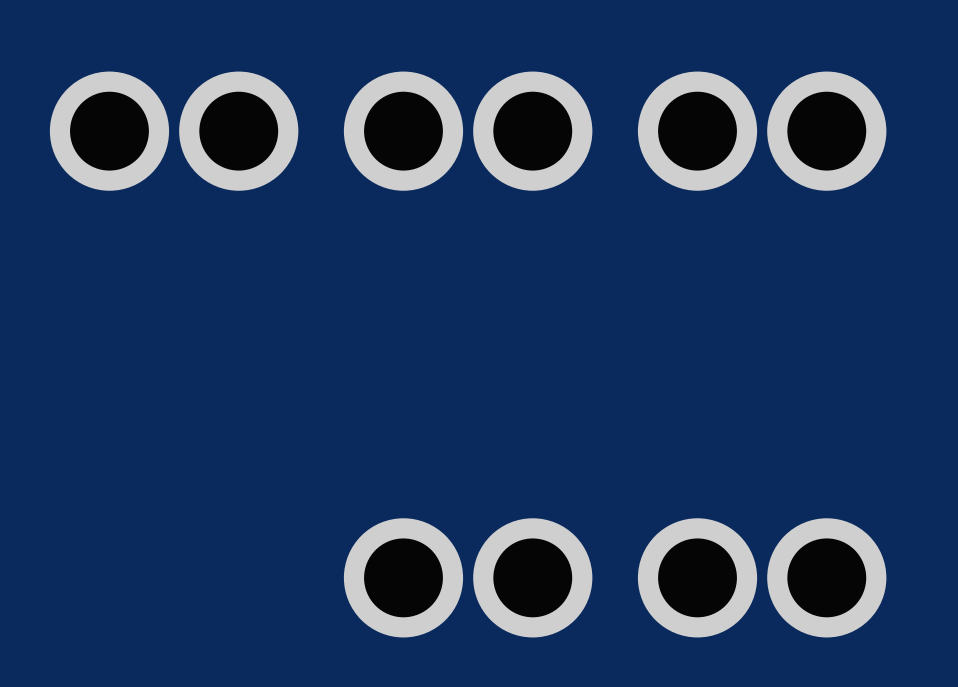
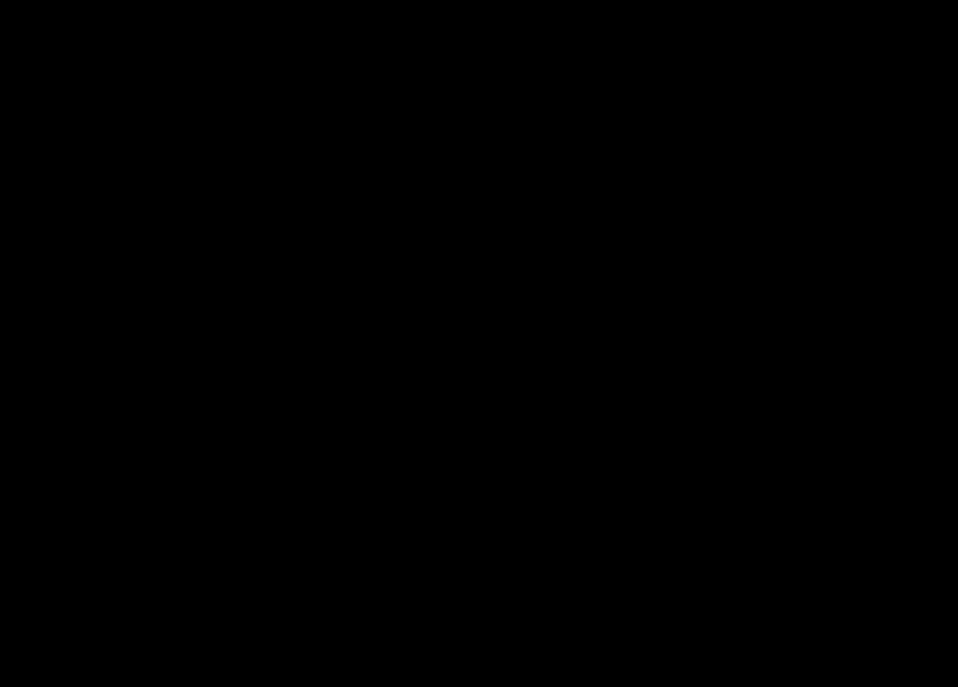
part: (174, 131) -> none
part: (468, 131) -> none
part: (762, 131) -> none
part: (468, 577) -> none
part: (762, 577) -> none

